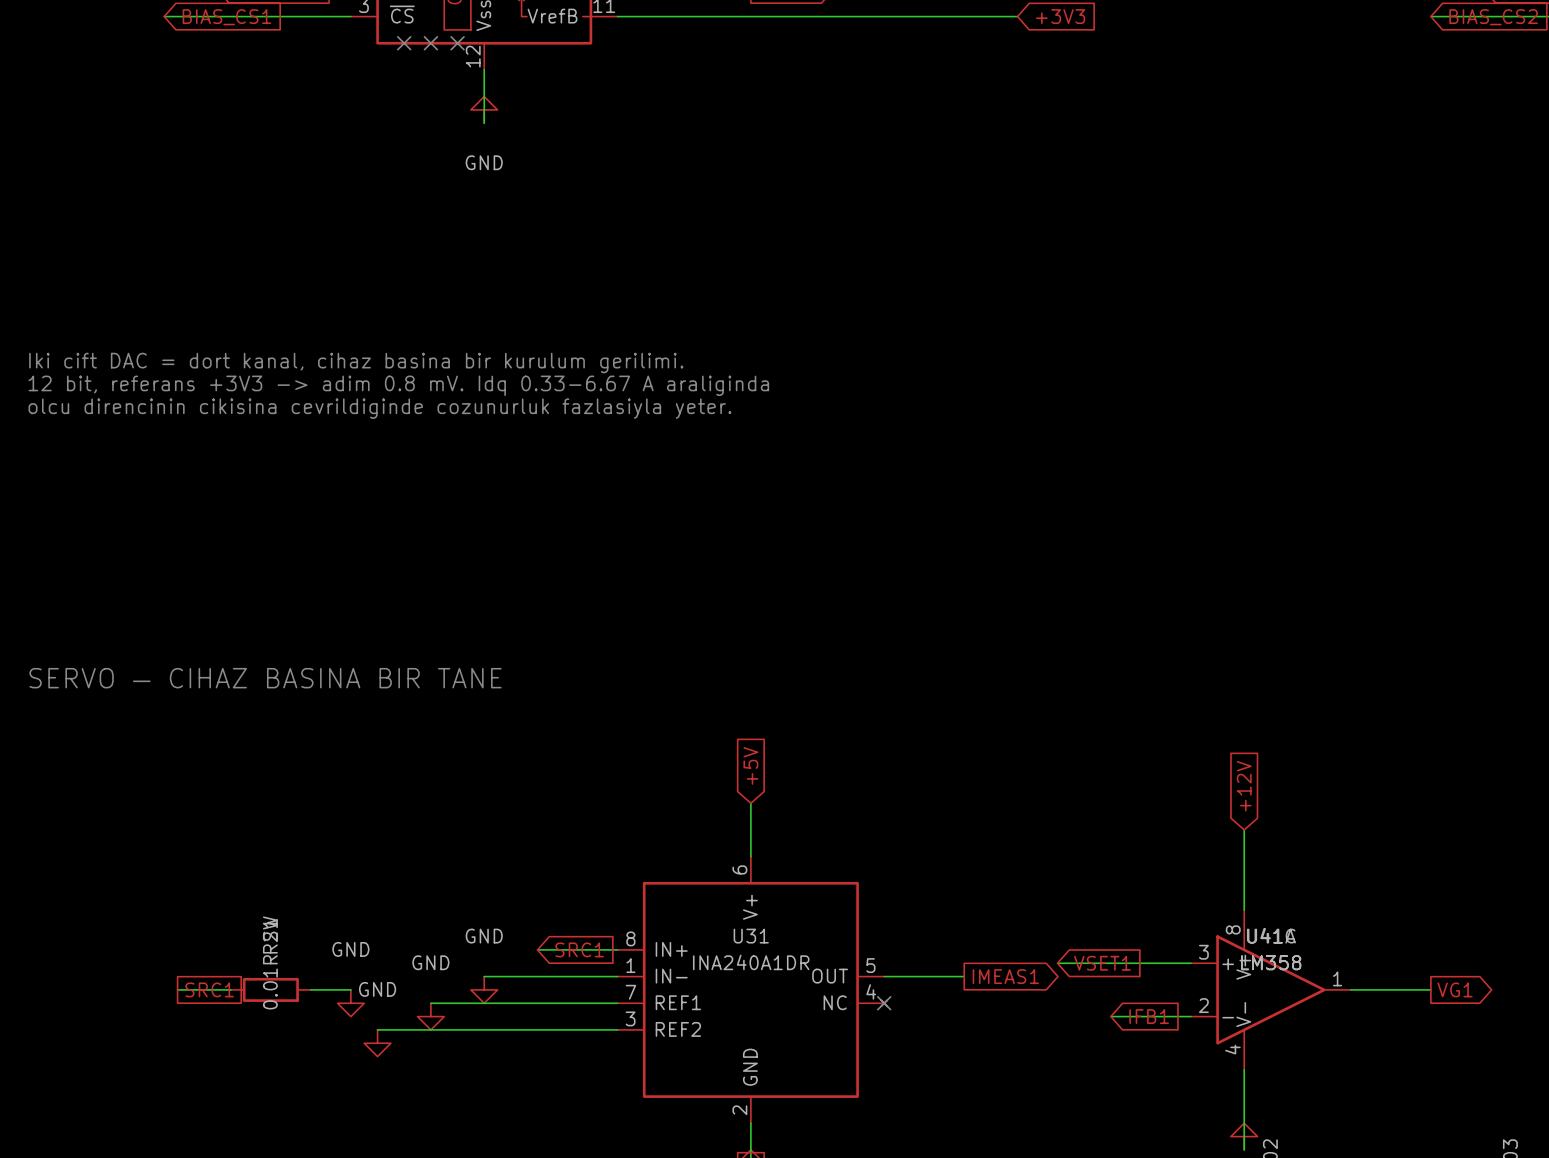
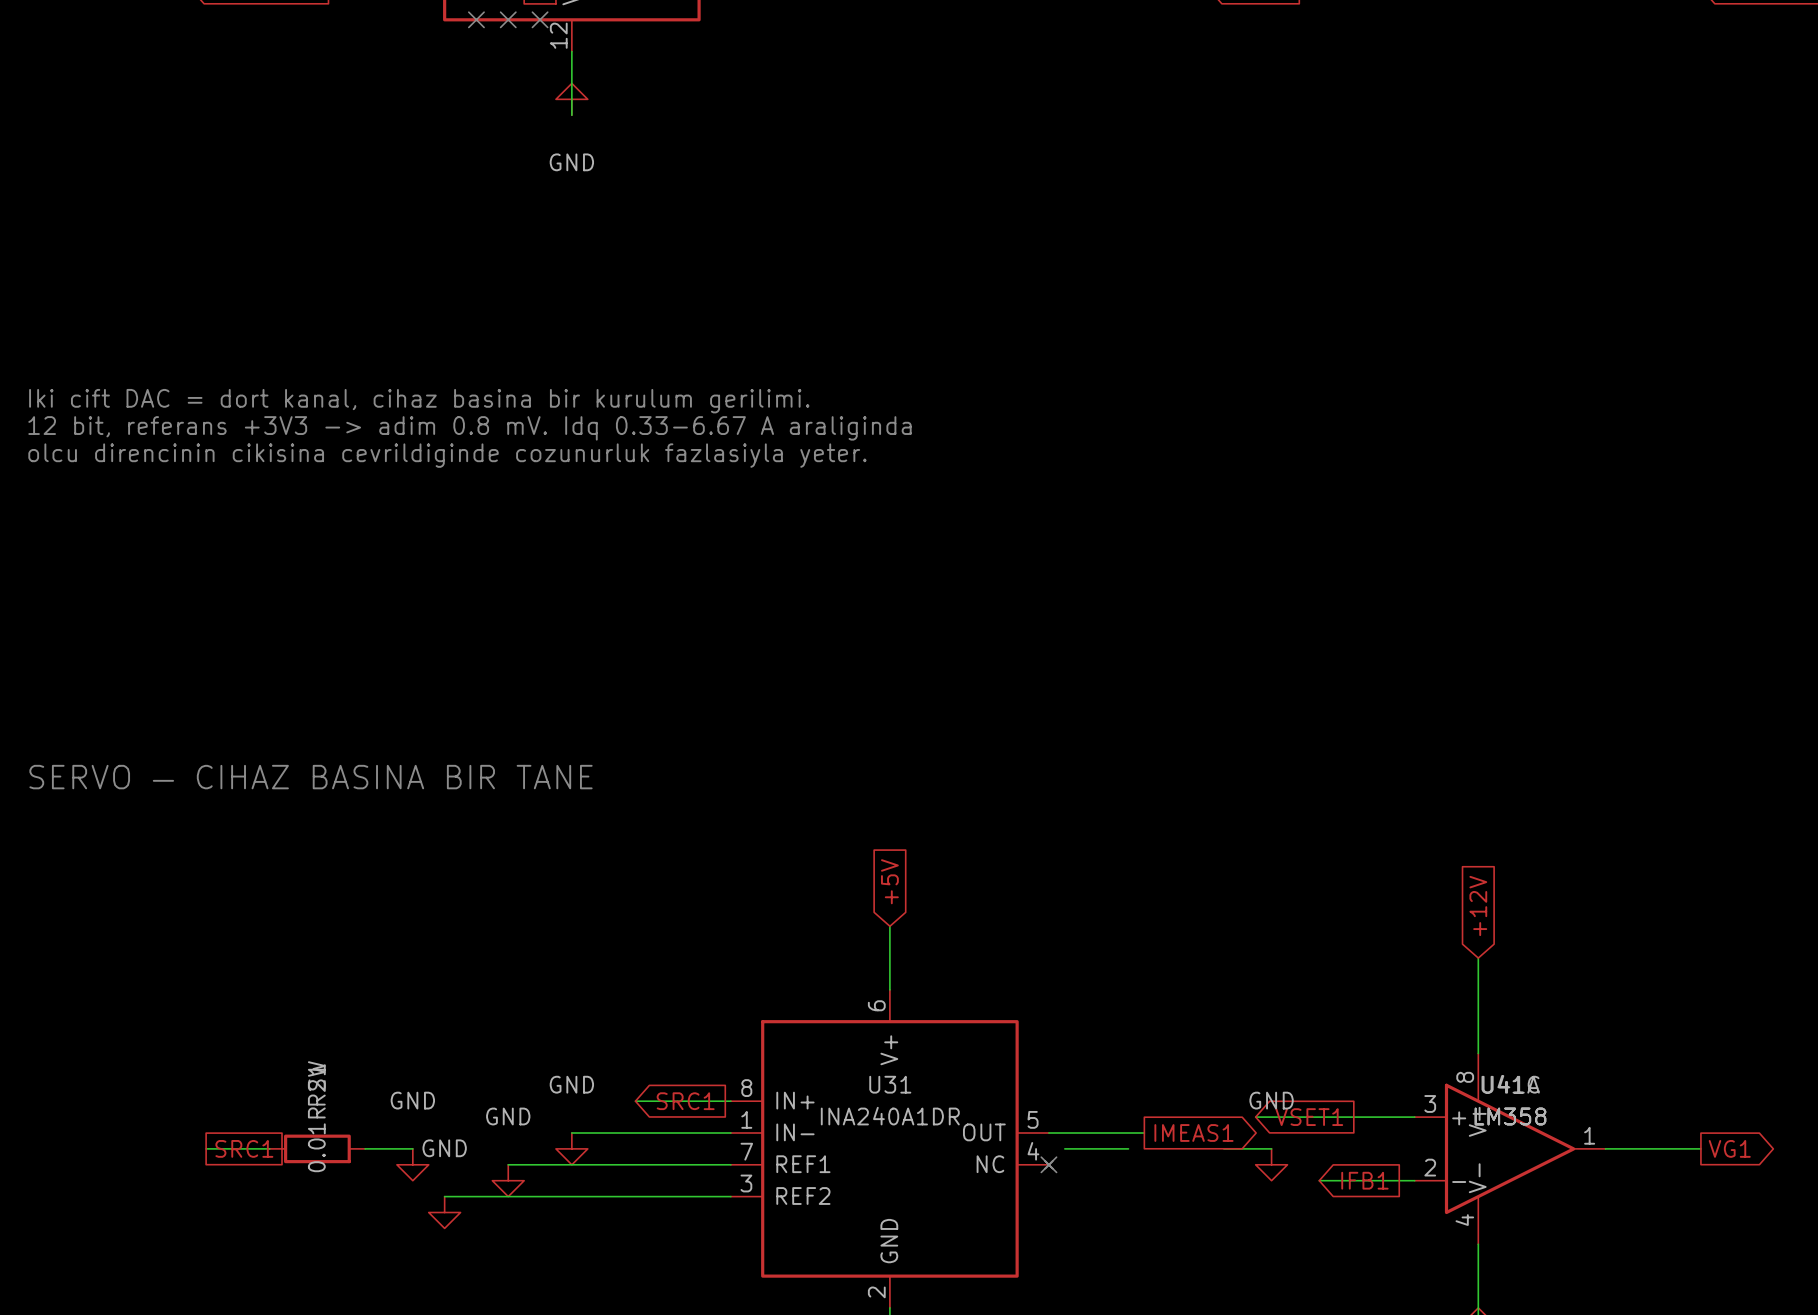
wire: none -> (1064, 1148) (1128, 1148)
wire: none -> (1223, 1148) (1271, 1148)
power symbol: none -> GND (1271, 1164)

